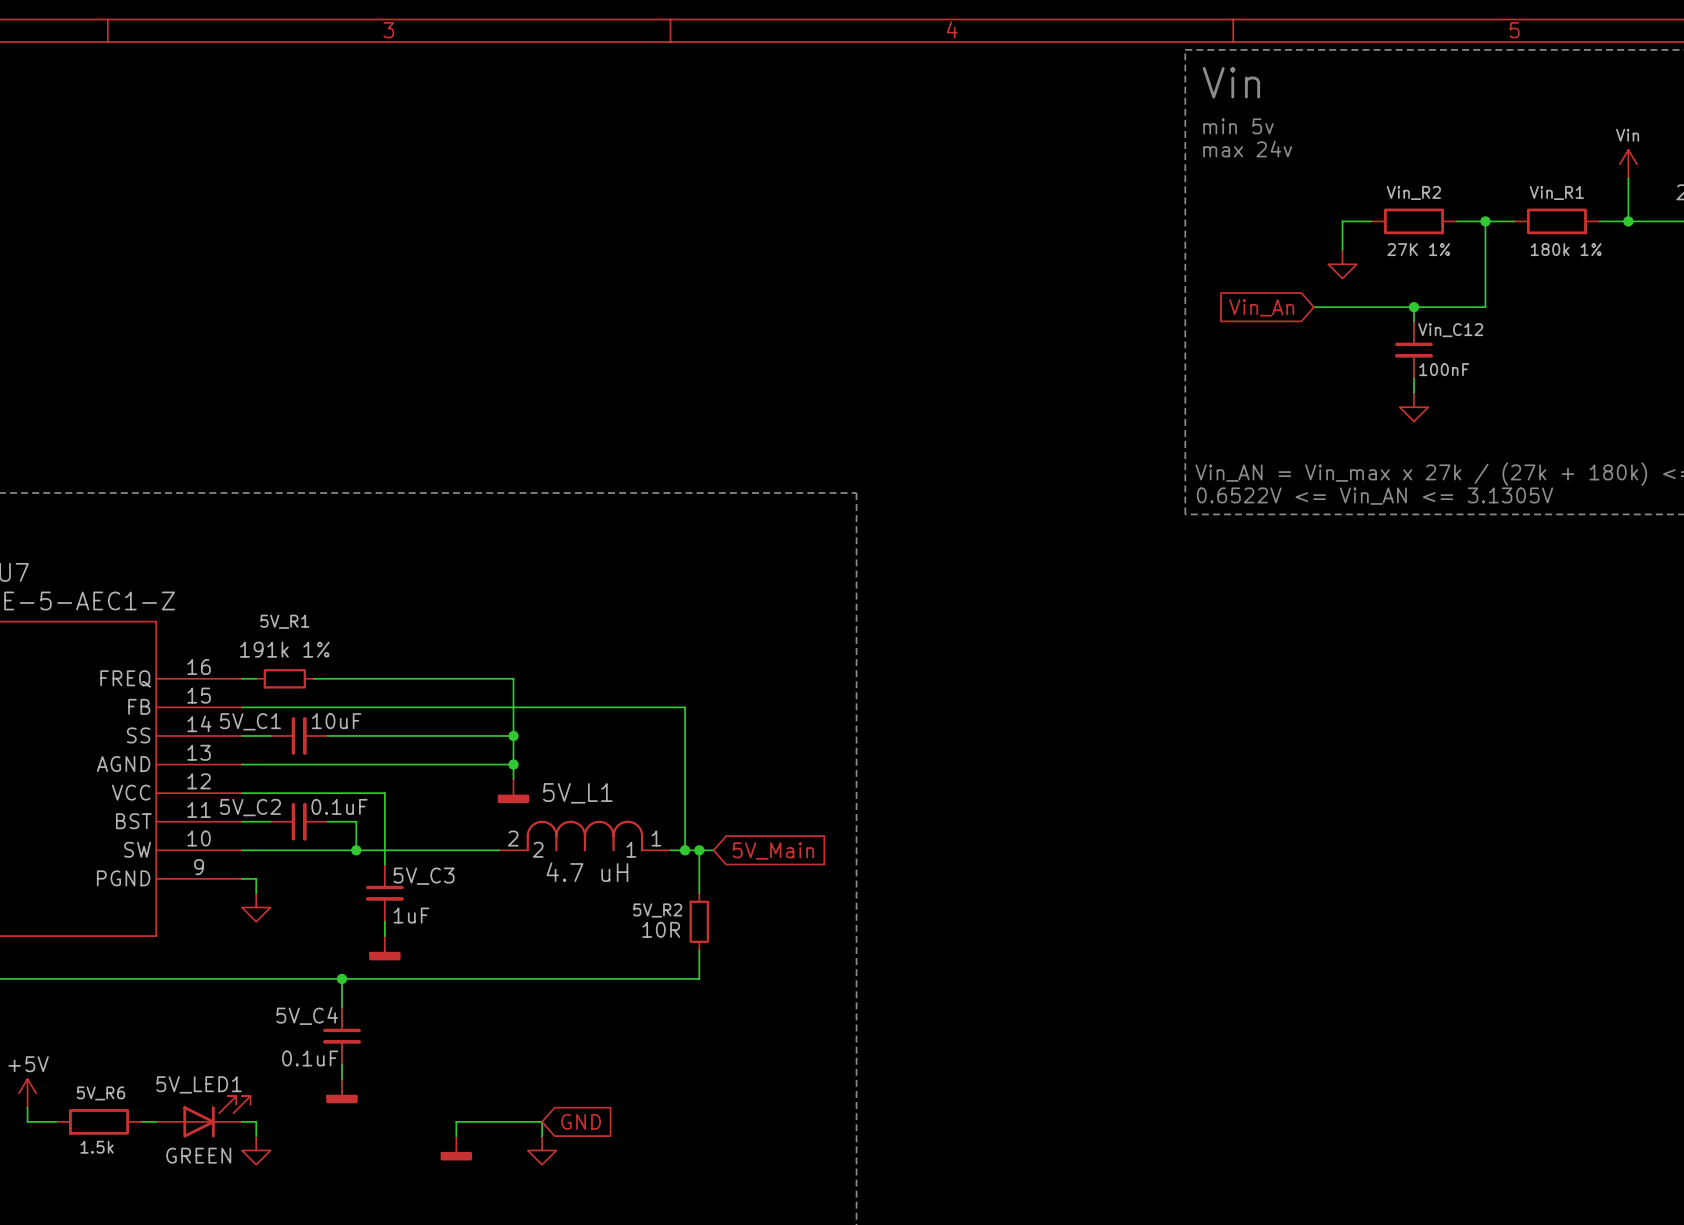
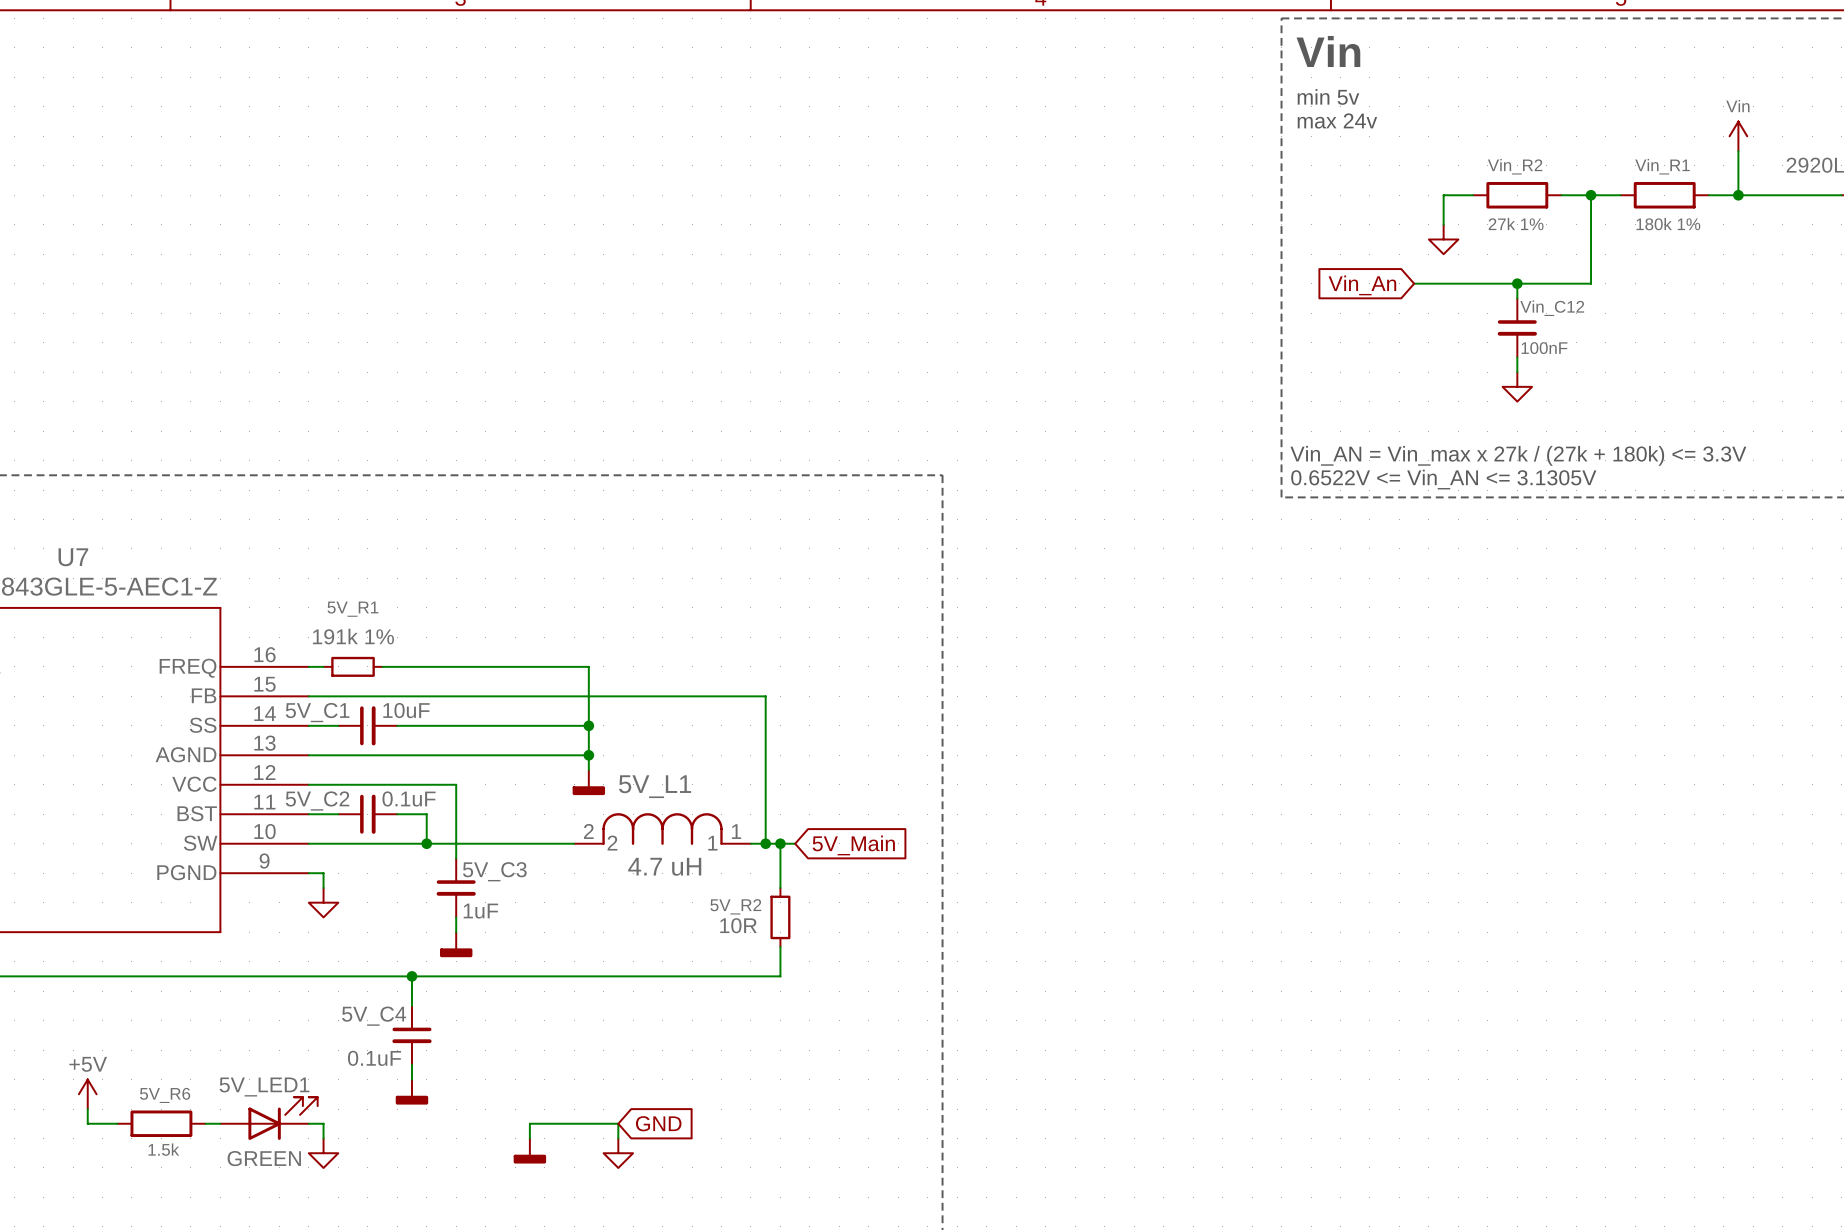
Vin_R2 value: 27K 1% (1418, 249) -> 27k 1% (1516, 224)

